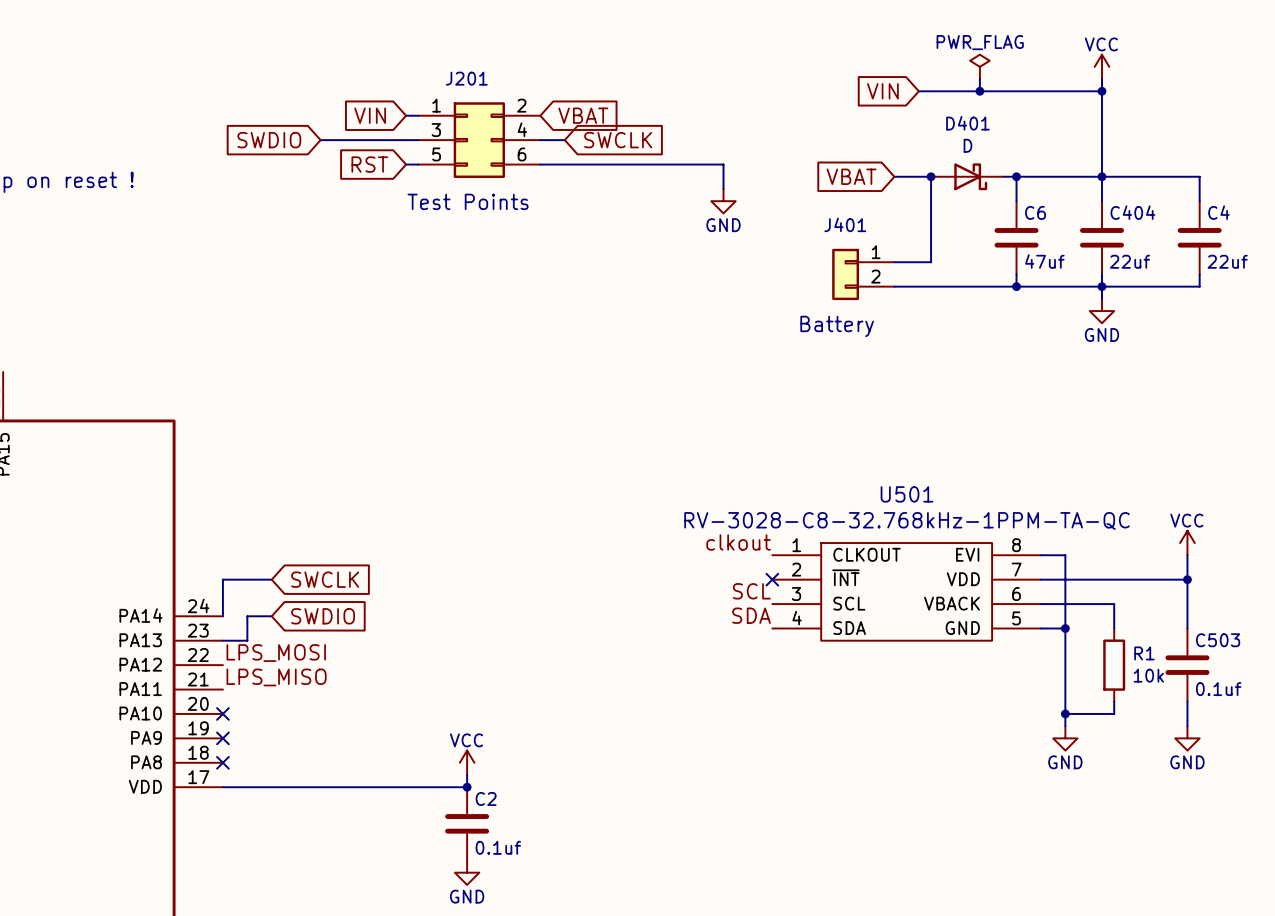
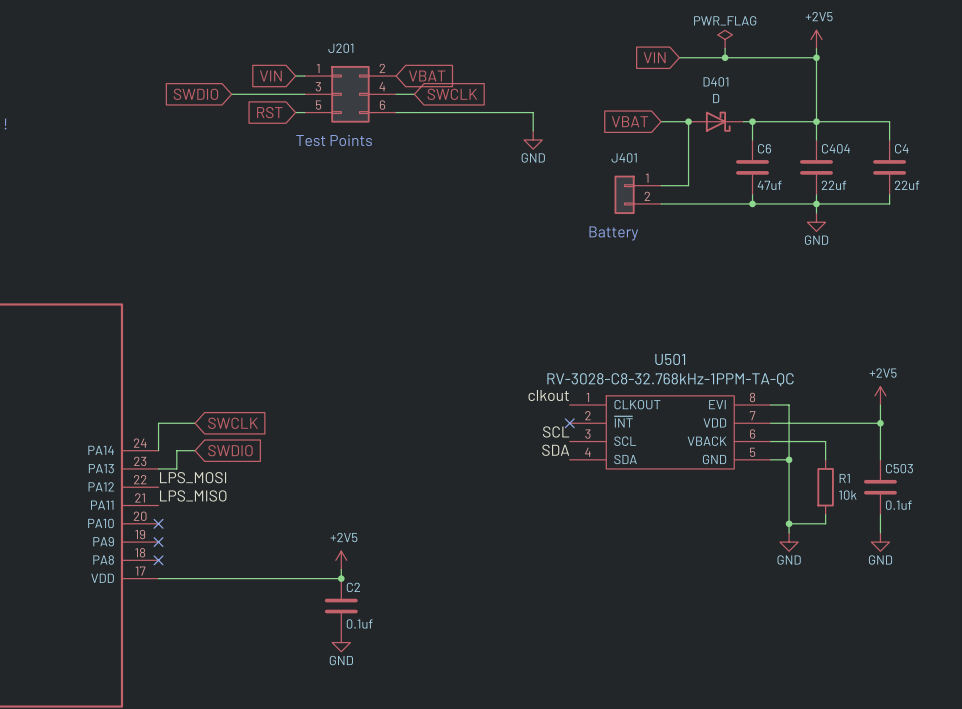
power symbol: VCC (1101, 66) -> +2V5 (816, 39)
power symbol: VCC (1187, 543) -> +2V5 (880, 395)
power symbol: VCC (467, 762) -> +2V5 (341, 560)

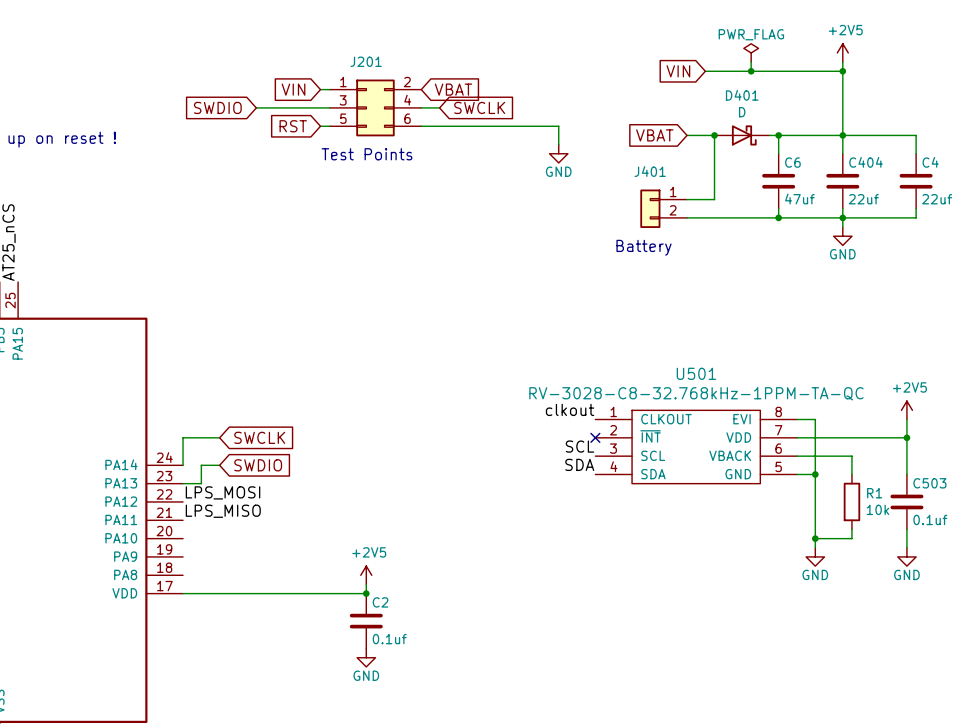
no-connect mark: (158, 523) -> none
no-connect mark: (158, 542) -> none
no-connect mark: (158, 560) -> none

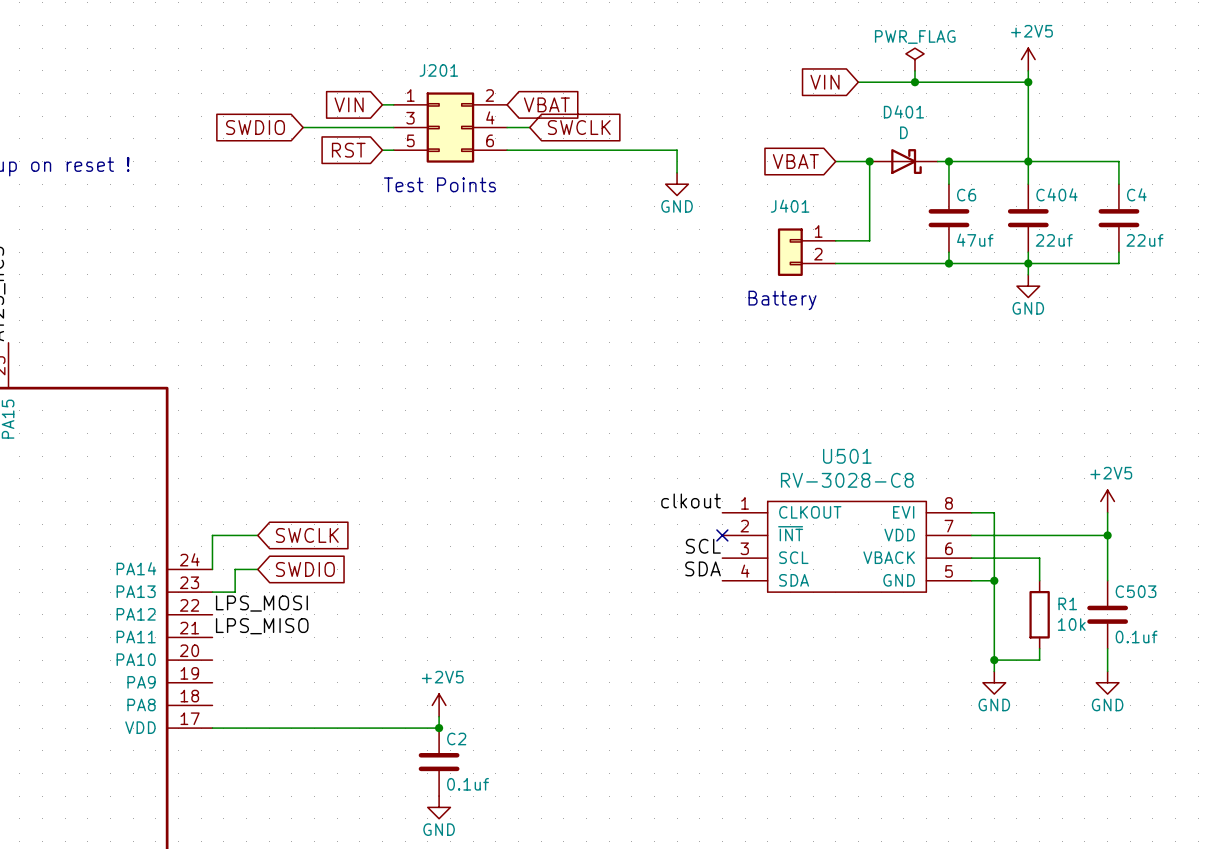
U501 value: RV-3028-C8-32.768kHz-1PPM-TA-QC (696, 393) -> RV-3028-C8 (847, 480)

